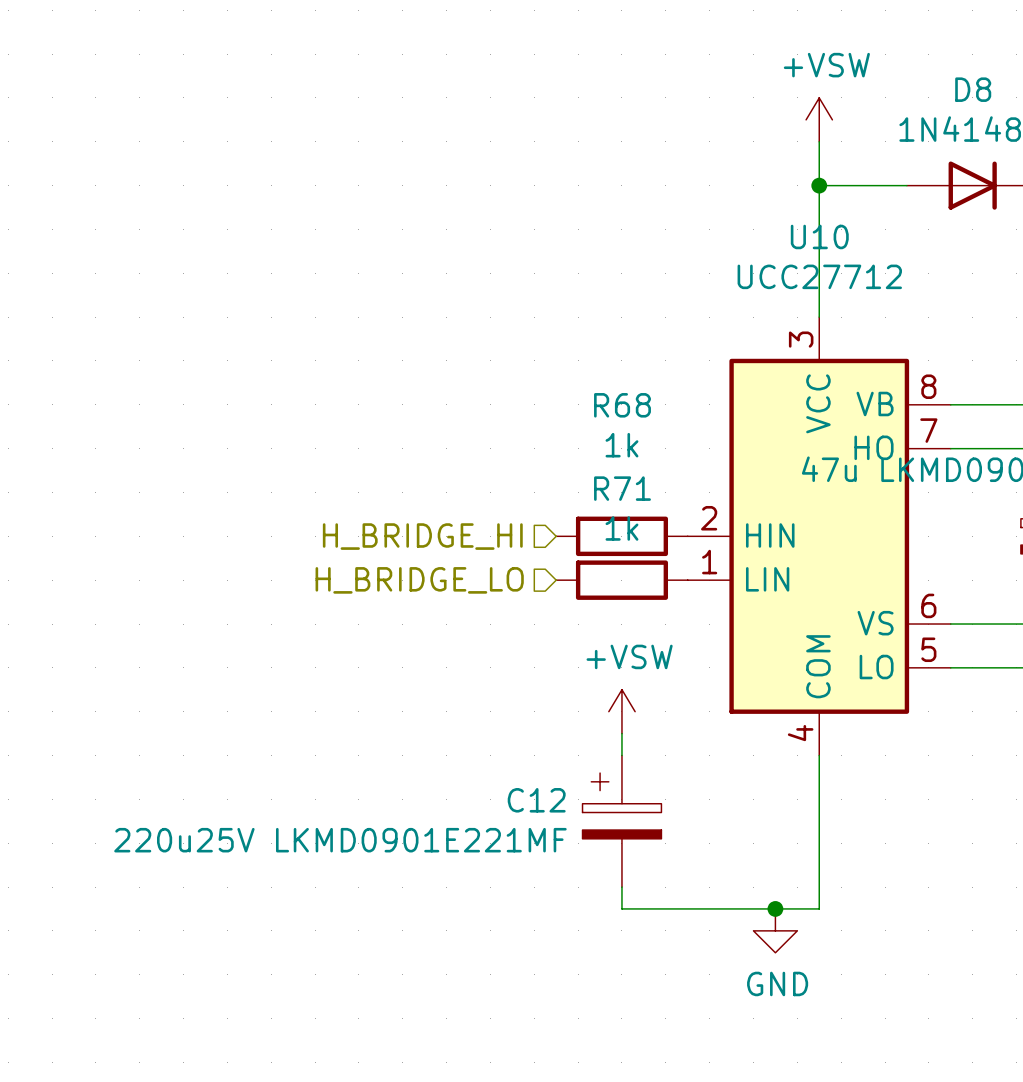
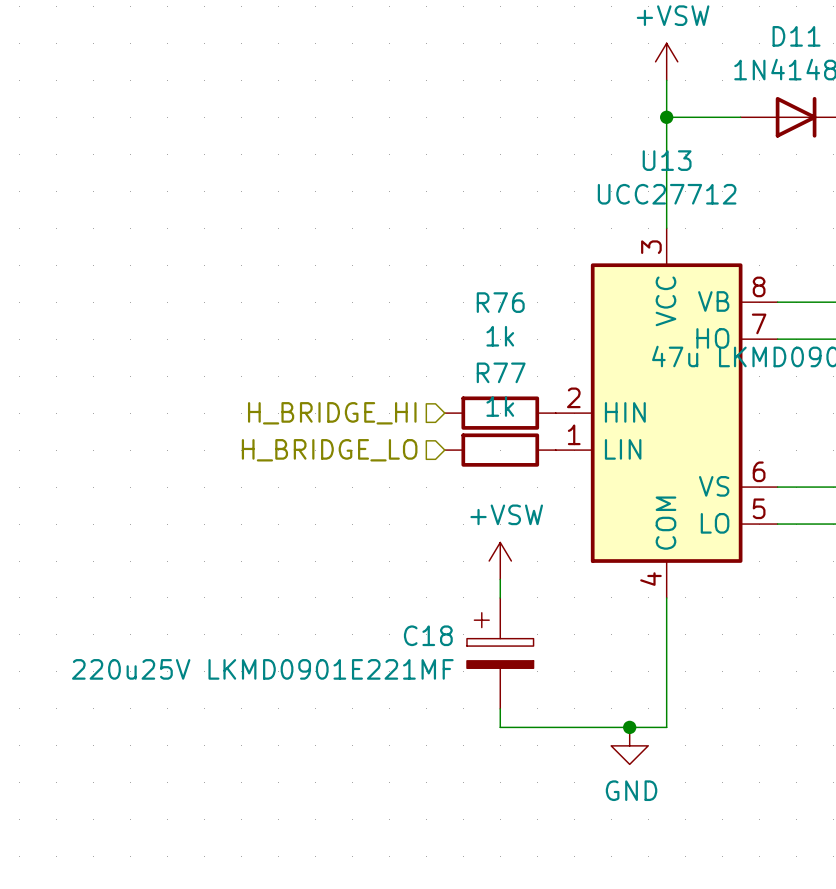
D8 name: D8 (973, 89) -> D11 (796, 36)
U10 name: U10 (819, 236) -> U13 (667, 160)
R68 name: R68 (622, 405) -> R76 (500, 302)
R71 name: R71 (622, 488) -> R77 (501, 372)
C12 name: C12 (536, 800) -> C18 (428, 635)

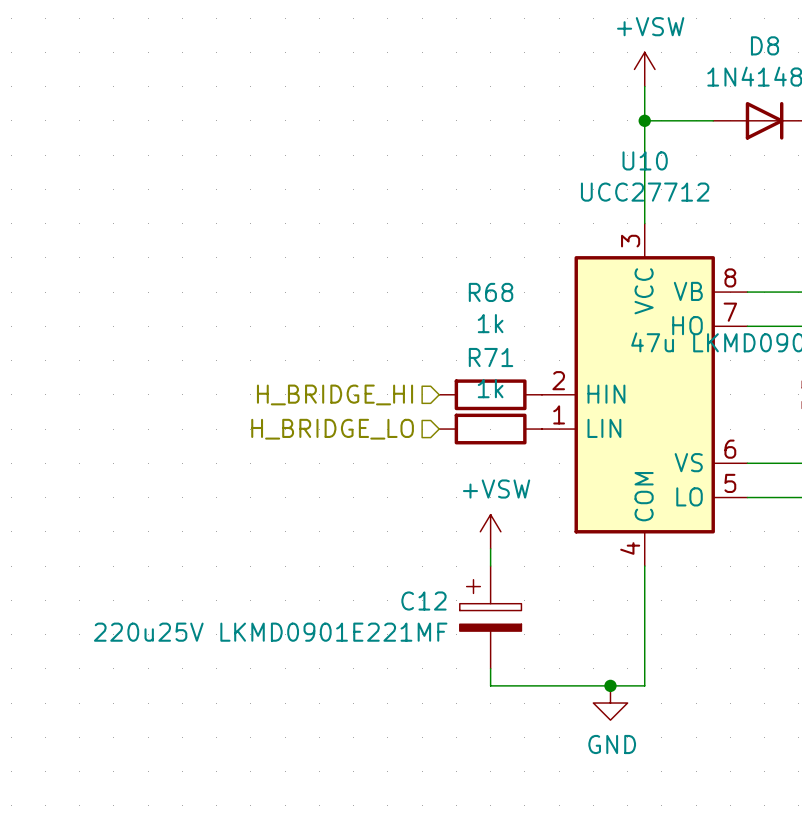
D11 name: D11 (796, 36) -> D8 (765, 45)
U13 name: U13 (667, 160) -> U10 (645, 160)
R76 name: R76 (500, 302) -> R68 (491, 292)
R77 name: R77 (501, 372) -> R71 (491, 357)
C18 name: C18 (428, 635) -> C12 (423, 601)

